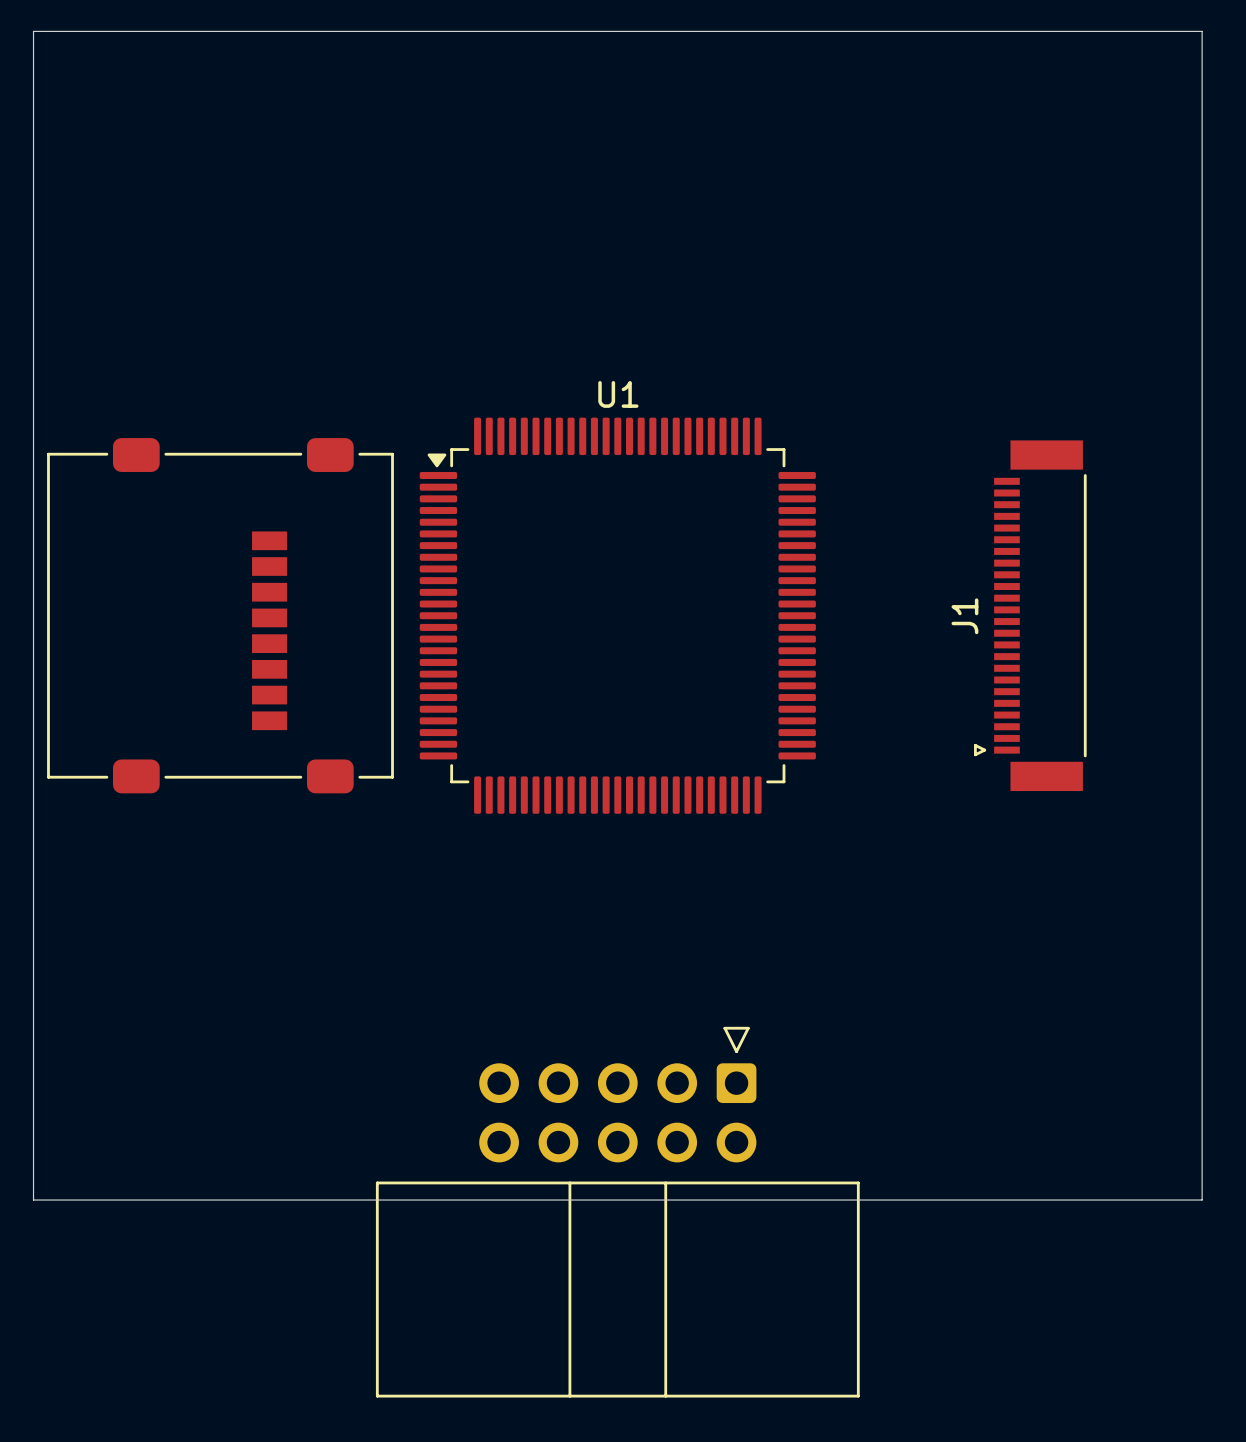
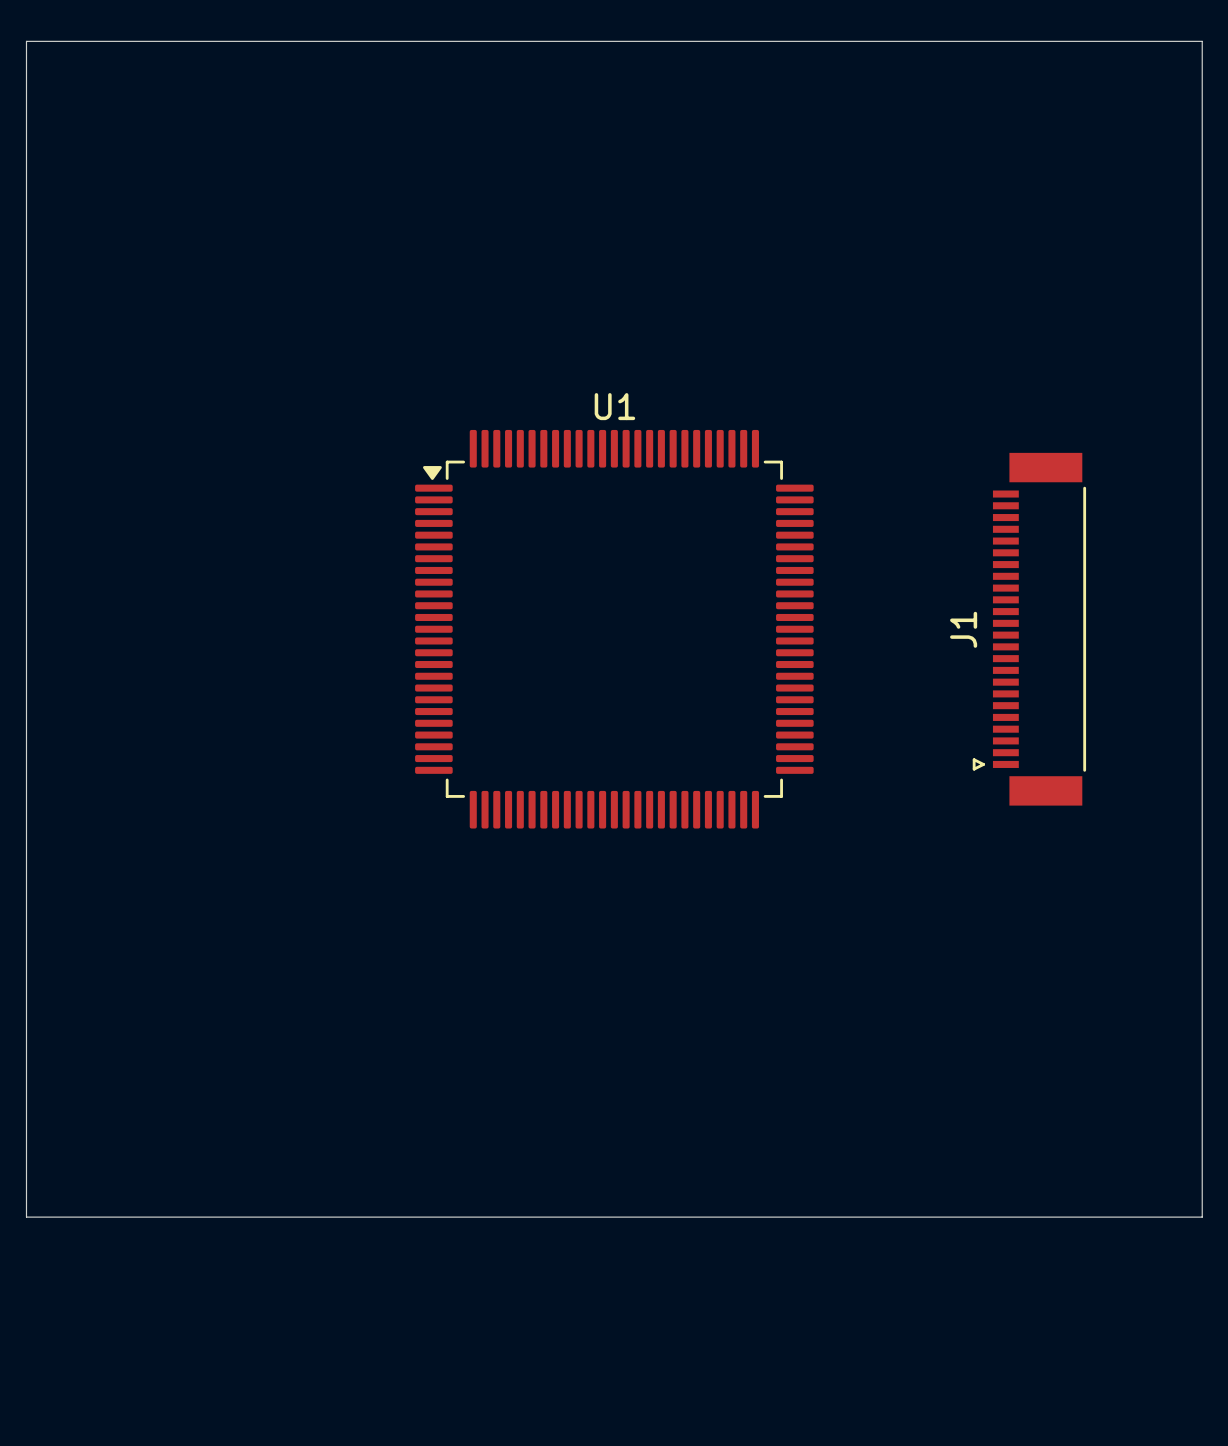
part: (220, 615) -> none
part: (617, 1212) -> none

